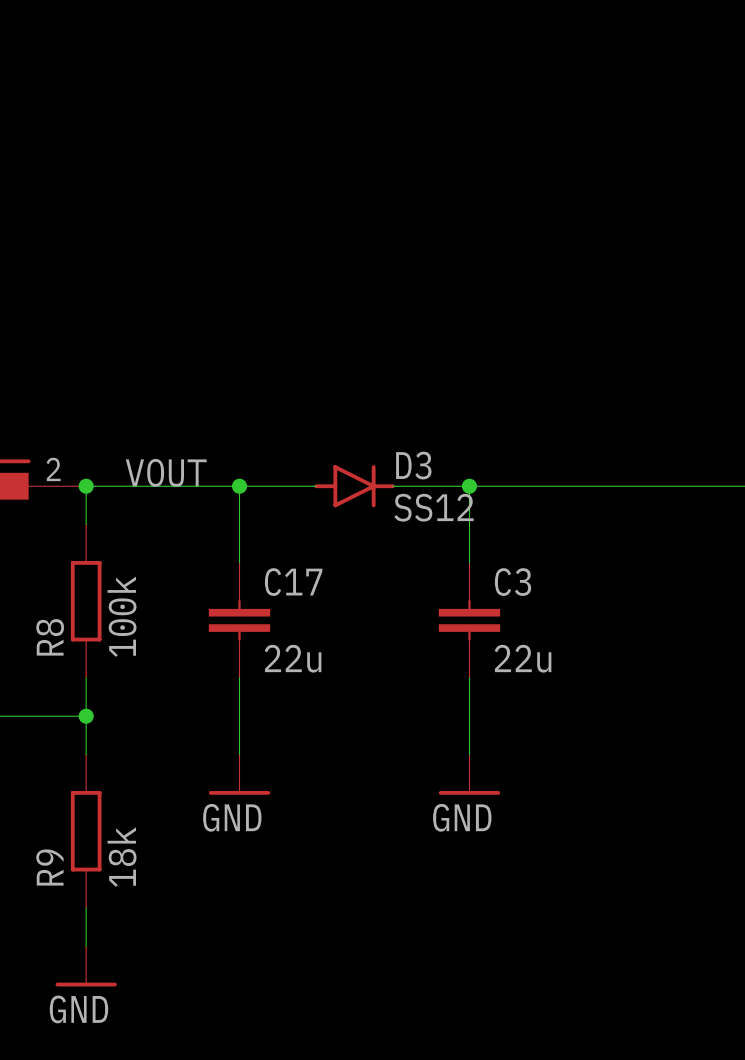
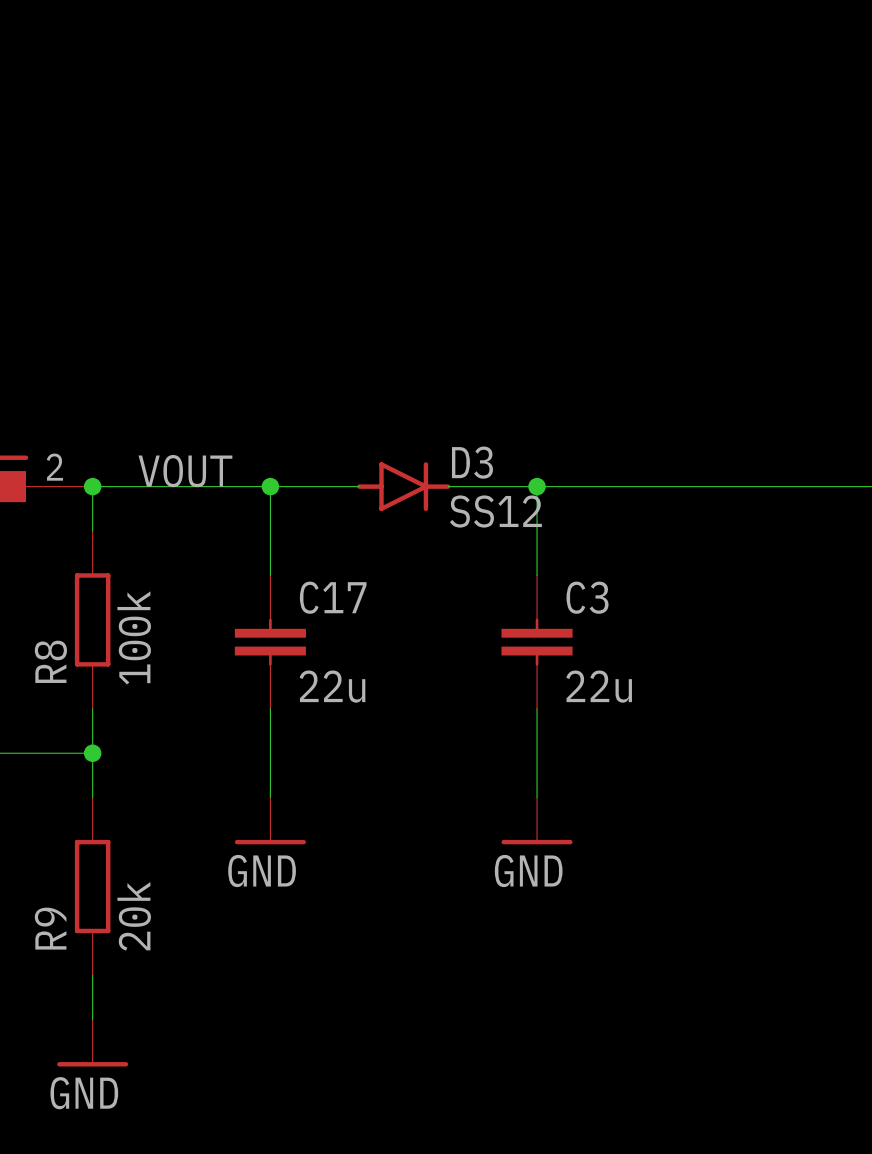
R9 value: 18k (122, 857) -> 20k (134, 916)

